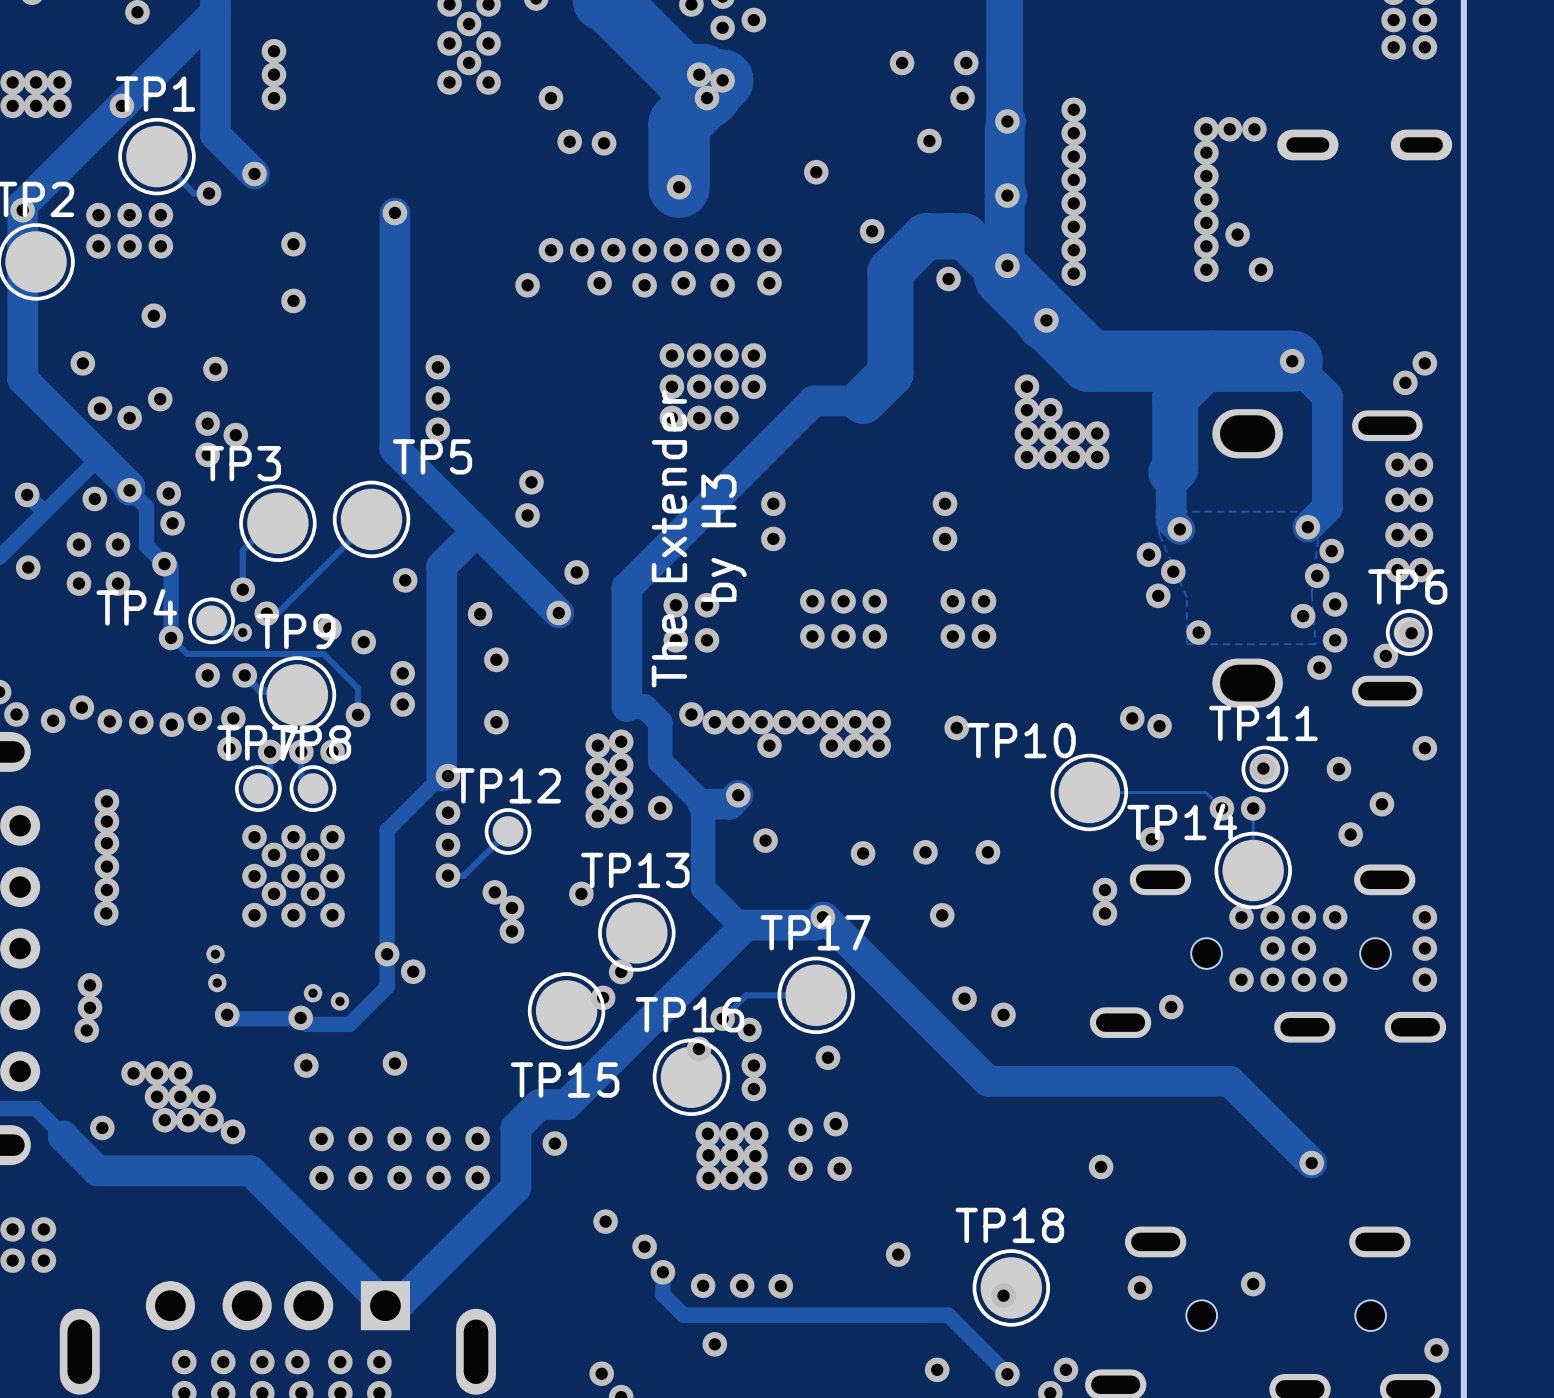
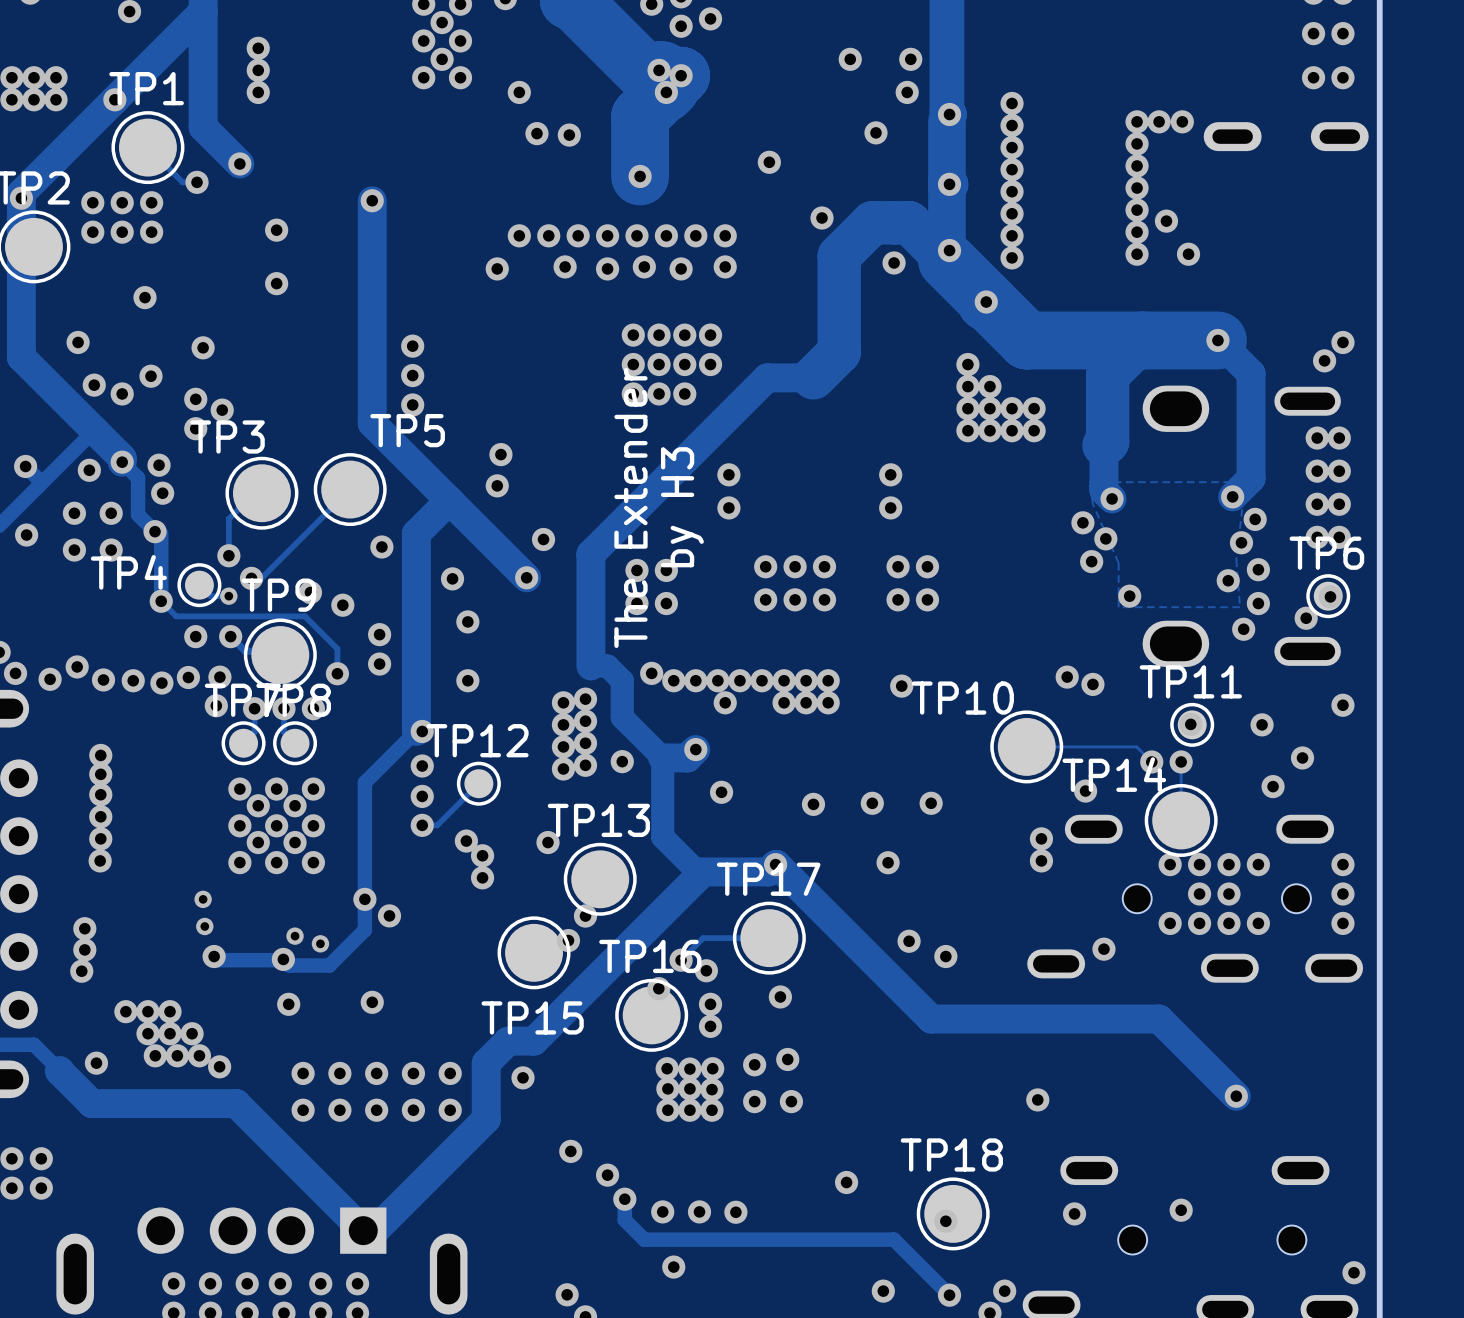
via: (1393, 20) -> none
via: (1424, 20) -> none
via: none -> (1313, 33)
via: none -> (1342, 33)
via: (1393, 47) -> none
via: (1424, 47) -> none
via: none -> (1313, 77)
via: none -> (1342, 77)

